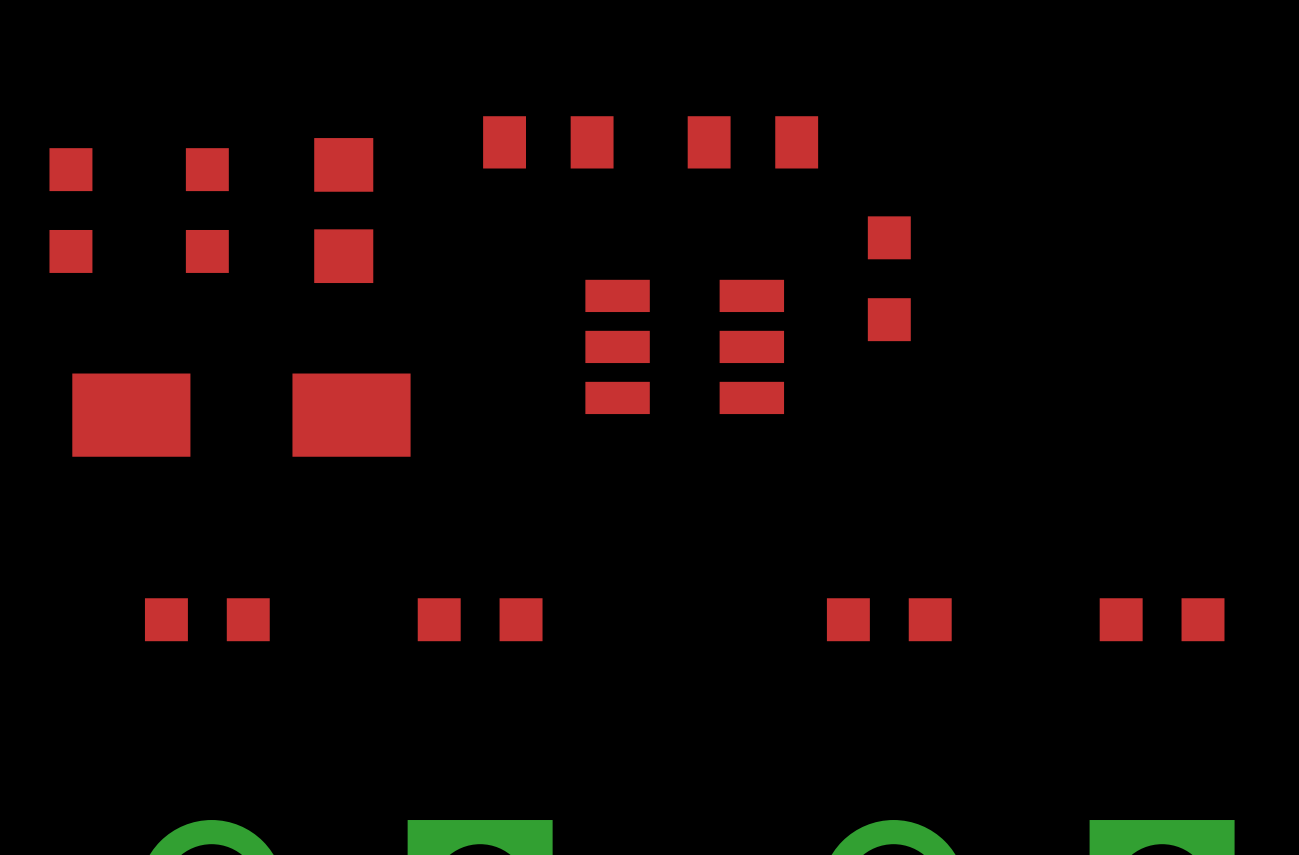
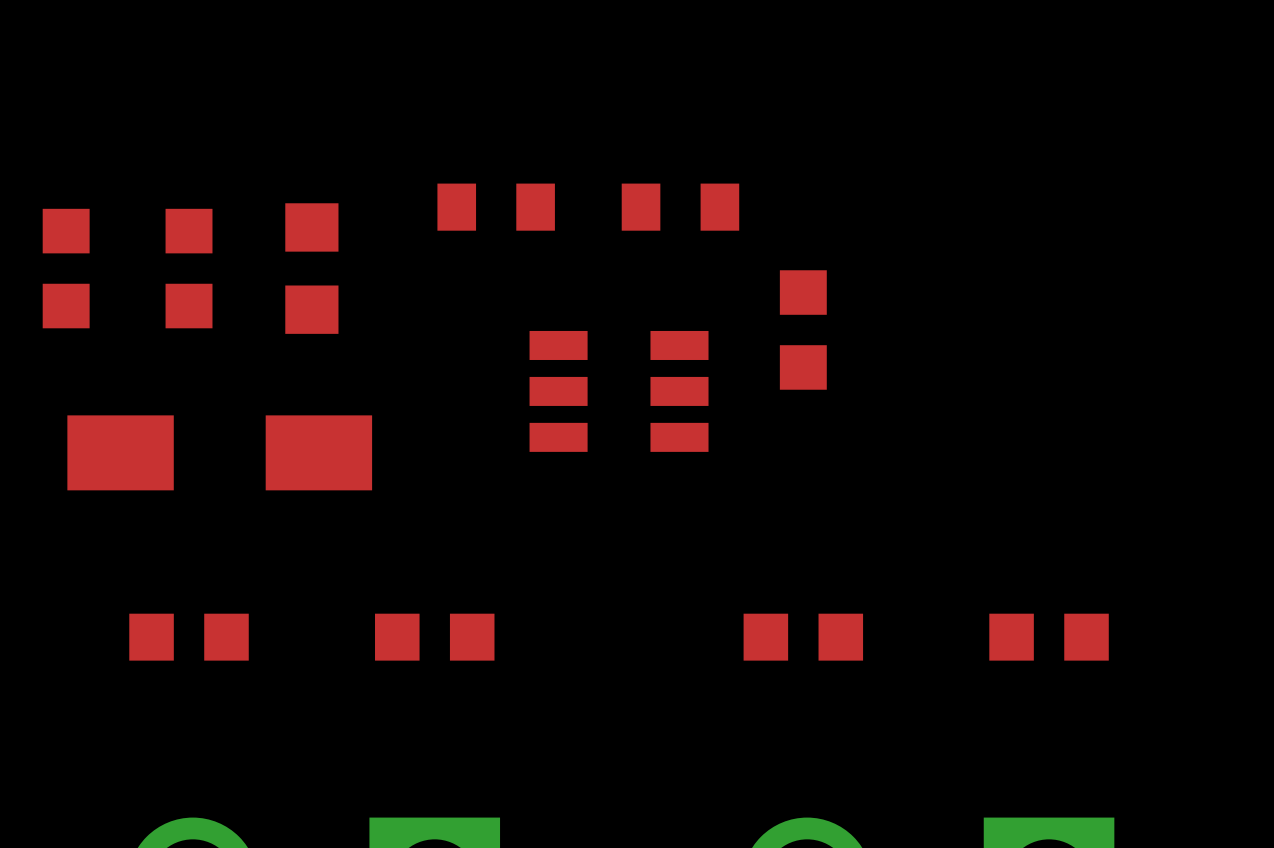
part footprint: [49, 148, 93, 273] -> [42, 208, 90, 329]
part footprint: [185, 148, 229, 273] -> [165, 208, 213, 329]
part footprint: [867, 216, 911, 342] -> [779, 270, 827, 390]
part footprint: [144, 598, 270, 642] -> [129, 613, 249, 661]
part footprint: [417, 598, 543, 642] -> [375, 613, 495, 661]
part footprint: [826, 598, 952, 642] -> [743, 613, 864, 661]
part footprint: [1099, 598, 1225, 642] -> [989, 613, 1109, 661]

